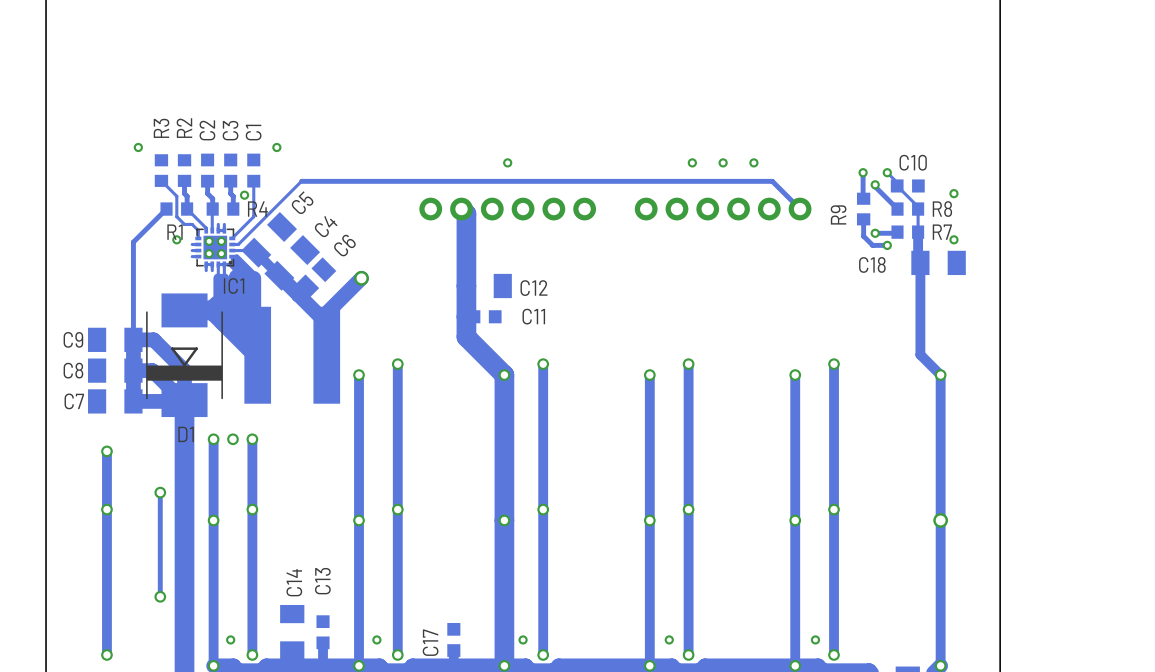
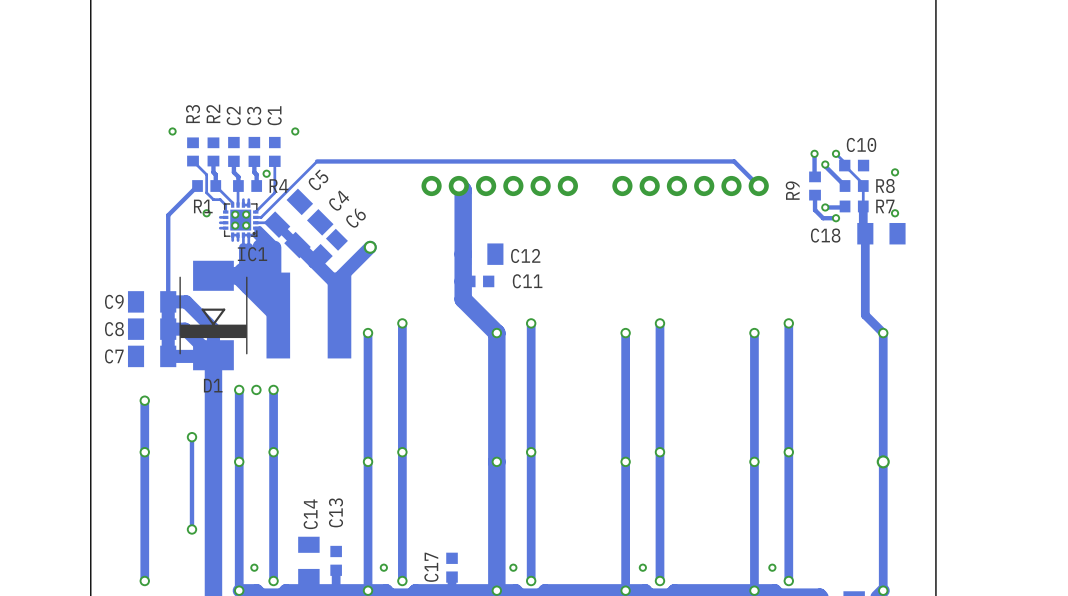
via: (507, 162) -> none
via: (692, 162) -> none
via: (723, 162) -> none
via: (753, 162) -> none

